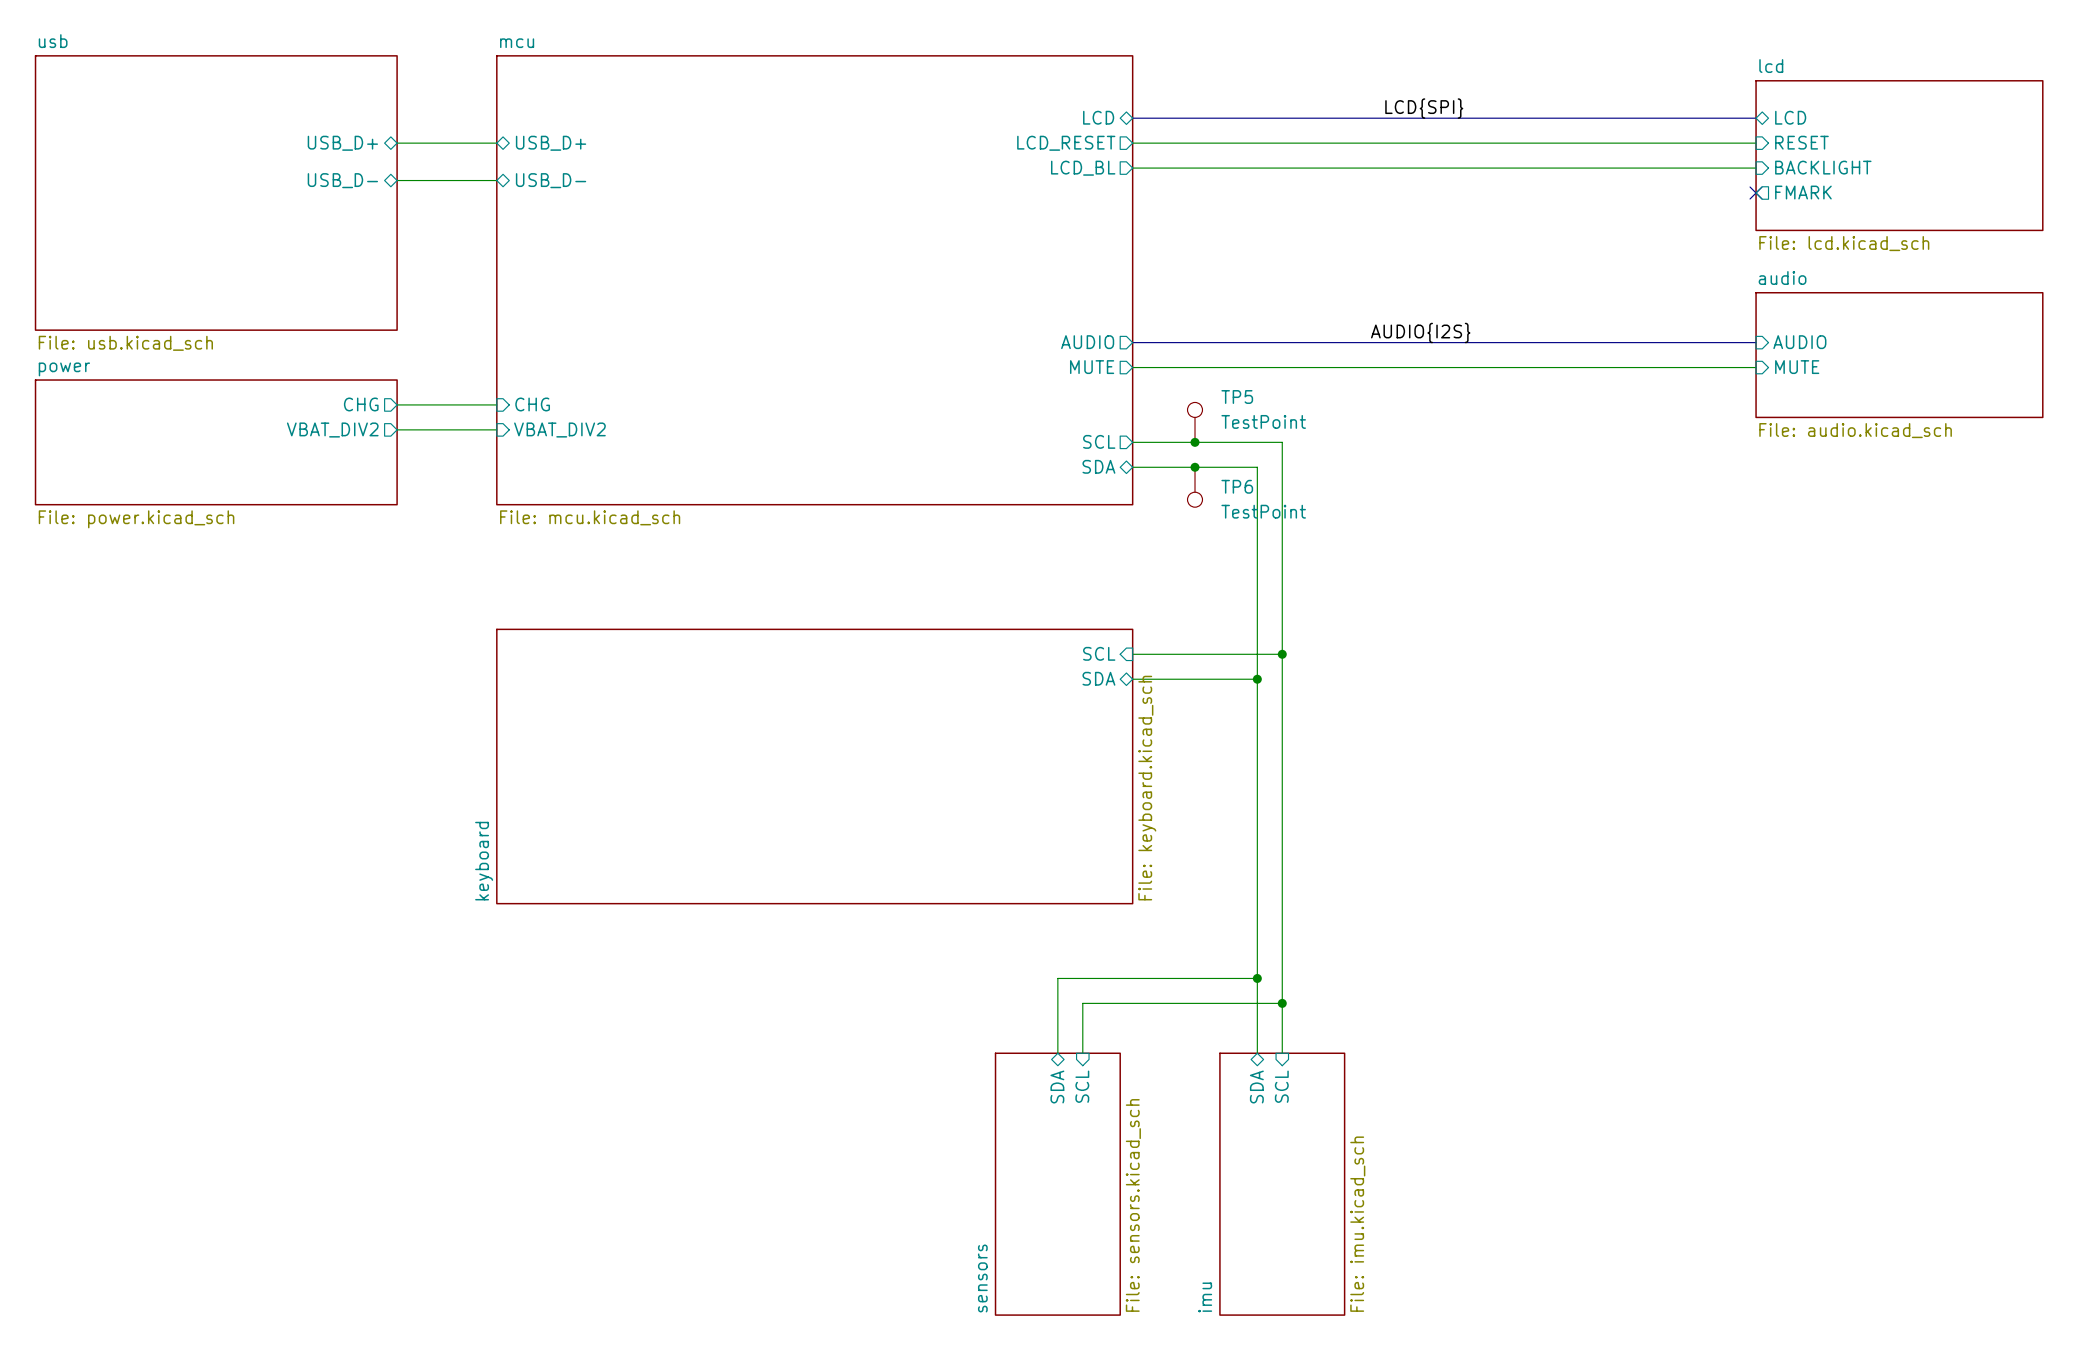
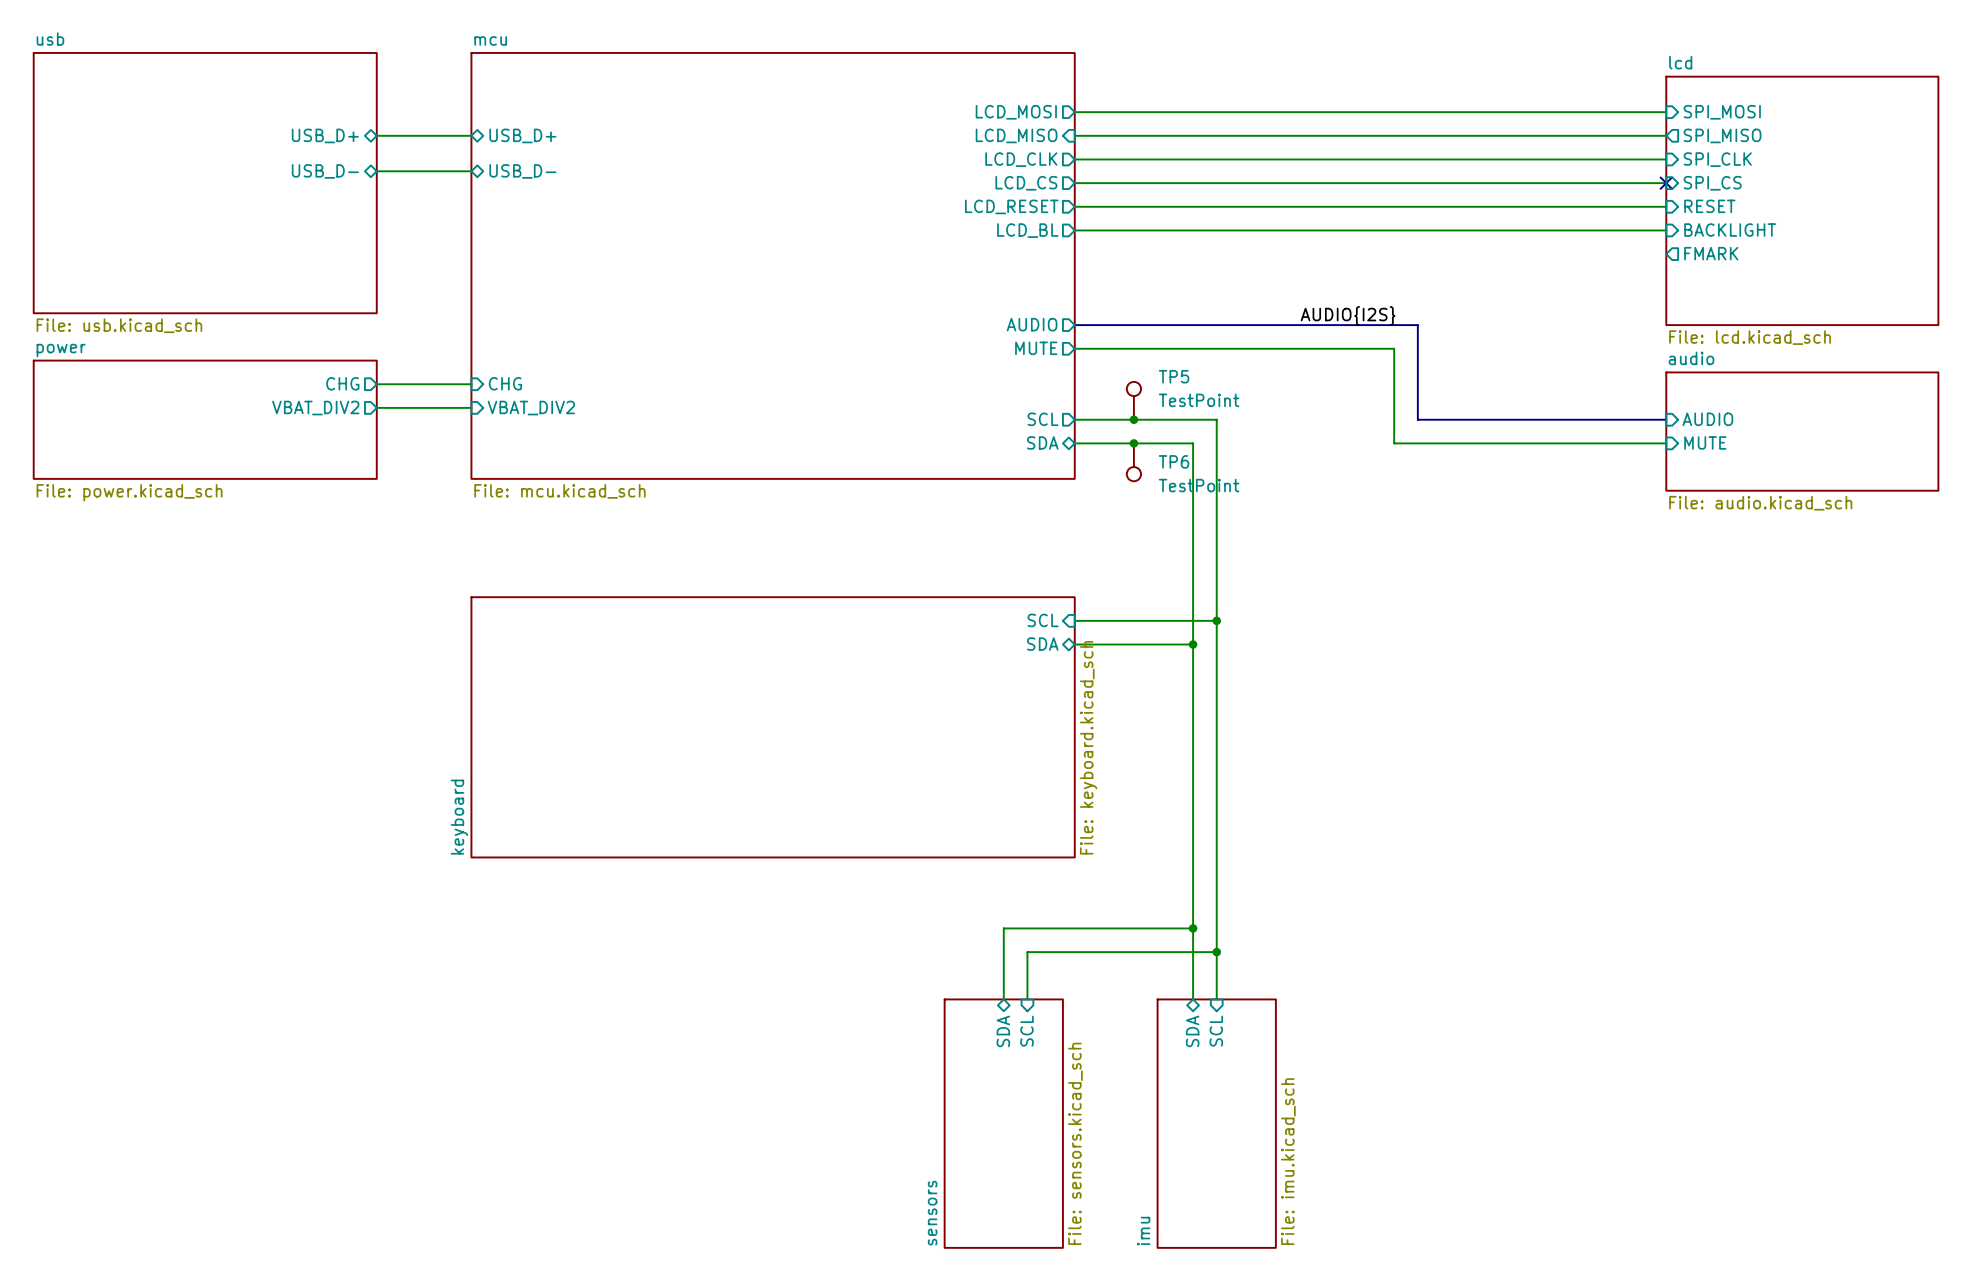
label: LCD{SPI} (1424, 108) -> none
sheet pin shape: bidirectional (1098, 117) -> output (1016, 112)
sheet pin: LCD (1098, 117) -> LCD_MOSI (1016, 112)
sheet pin shape: bidirectional (1790, 117) -> input (1722, 112)
sheet pin: LCD (1790, 117) -> SPI_MOSI (1722, 112)
bus: (1132, 118) (1756, 118) -> none
sheet pin shape: input (1801, 142) -> output (1722, 135)
sheet pin: RESET (1801, 142) -> SPI_MISO (1722, 135)
sheet pin shape: output (1066, 143) -> input (1016, 135)
sheet pin: LCD_RESET (1066, 143) -> LCD_MISO (1016, 135)
sheet lcd: File: lcd.kicad_sch (1899, 155) -> none
sheet pin: BACKLIGHT (1823, 167) -> SPI_CLK (1717, 159)
sheet pin: LCD_BL (1083, 168) -> LCD_CLK (1021, 159)
sheet pin shape: output (1803, 192) -> input (1712, 183)
sheet pin: FMARK (1803, 192) -> SPI_CS (1712, 183)
sheet pin: none -> LCD_CS (1026, 183)
wire: none -> (1074, 183) (1666, 183)
sheet lcd: none -> File: lcd.kicad_sch (1802, 200)
wire: none -> (1074, 206) (1666, 206)
sheet pin: none -> RESET (1709, 206)
sheet pin: none -> LCD_RESET (1011, 206)
wire: none -> (1074, 230) (1666, 230)
sheet pin: none -> BACKLIGHT (1730, 230)
sheet pin: none -> LCD_BL (1027, 230)
sheet pin: none -> FMARK (1711, 253)
bus: (1494, 342) (1756, 342) -> (1417, 325) (1417, 419) (1666, 419)
sheet pin position: AUDIO (1799, 342) -> AUDIO (1707, 419)
sheet audio position: (1899, 355) -> (1802, 431)
wire: (1469, 367) (1756, 367) -> (1394, 348) (1394, 443) (1666, 443)
sheet pin position: MUTE (1797, 367) -> MUTE (1705, 442)

